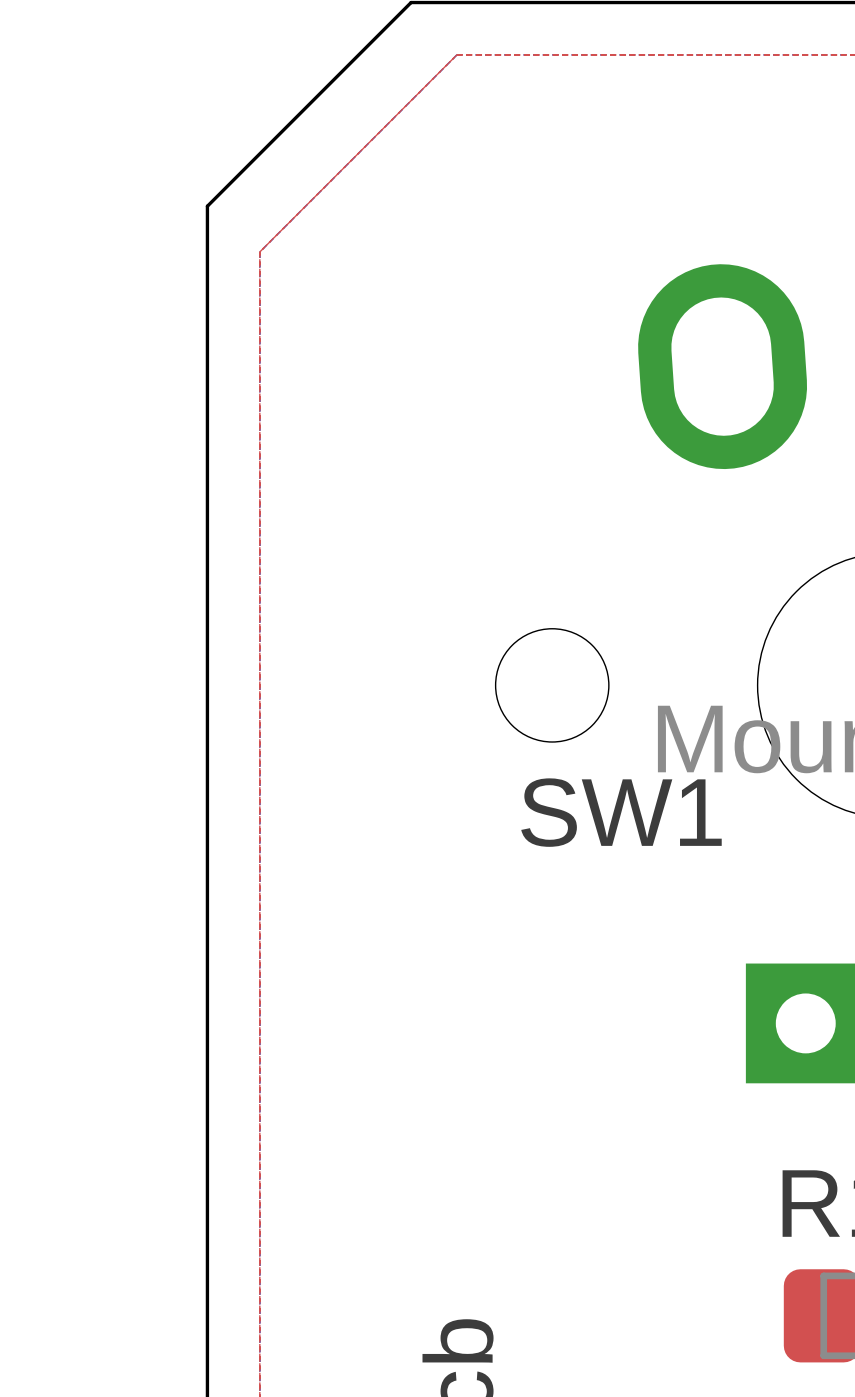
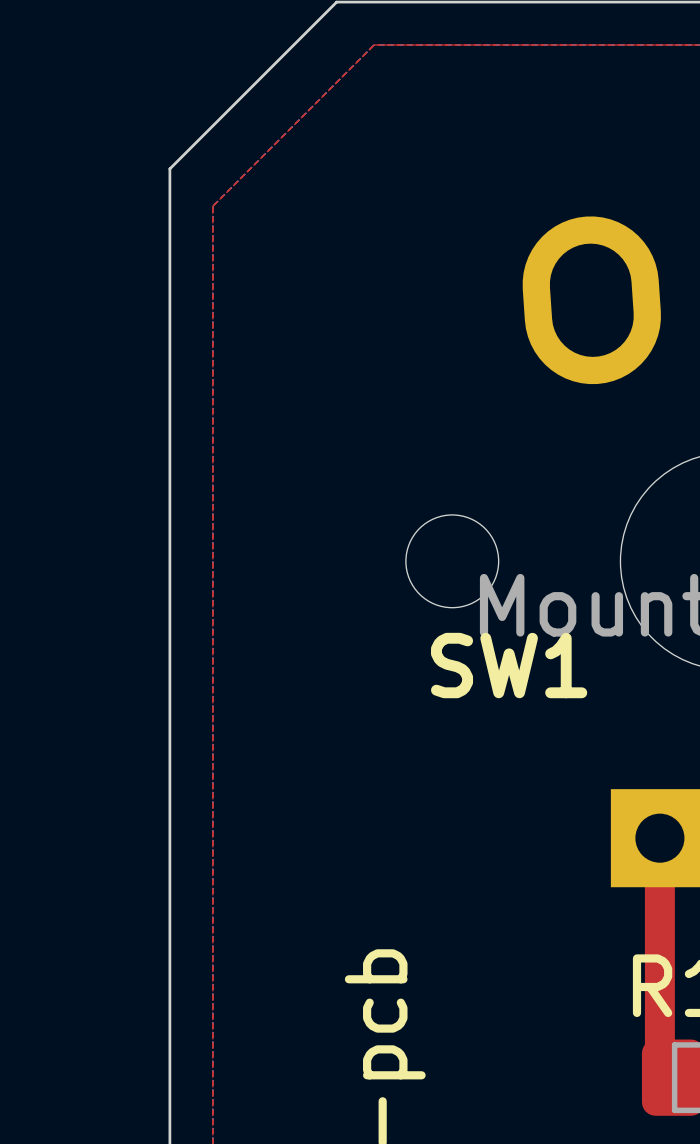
top track: none -> (659, 838) (659, 1064) (673, 1077)

